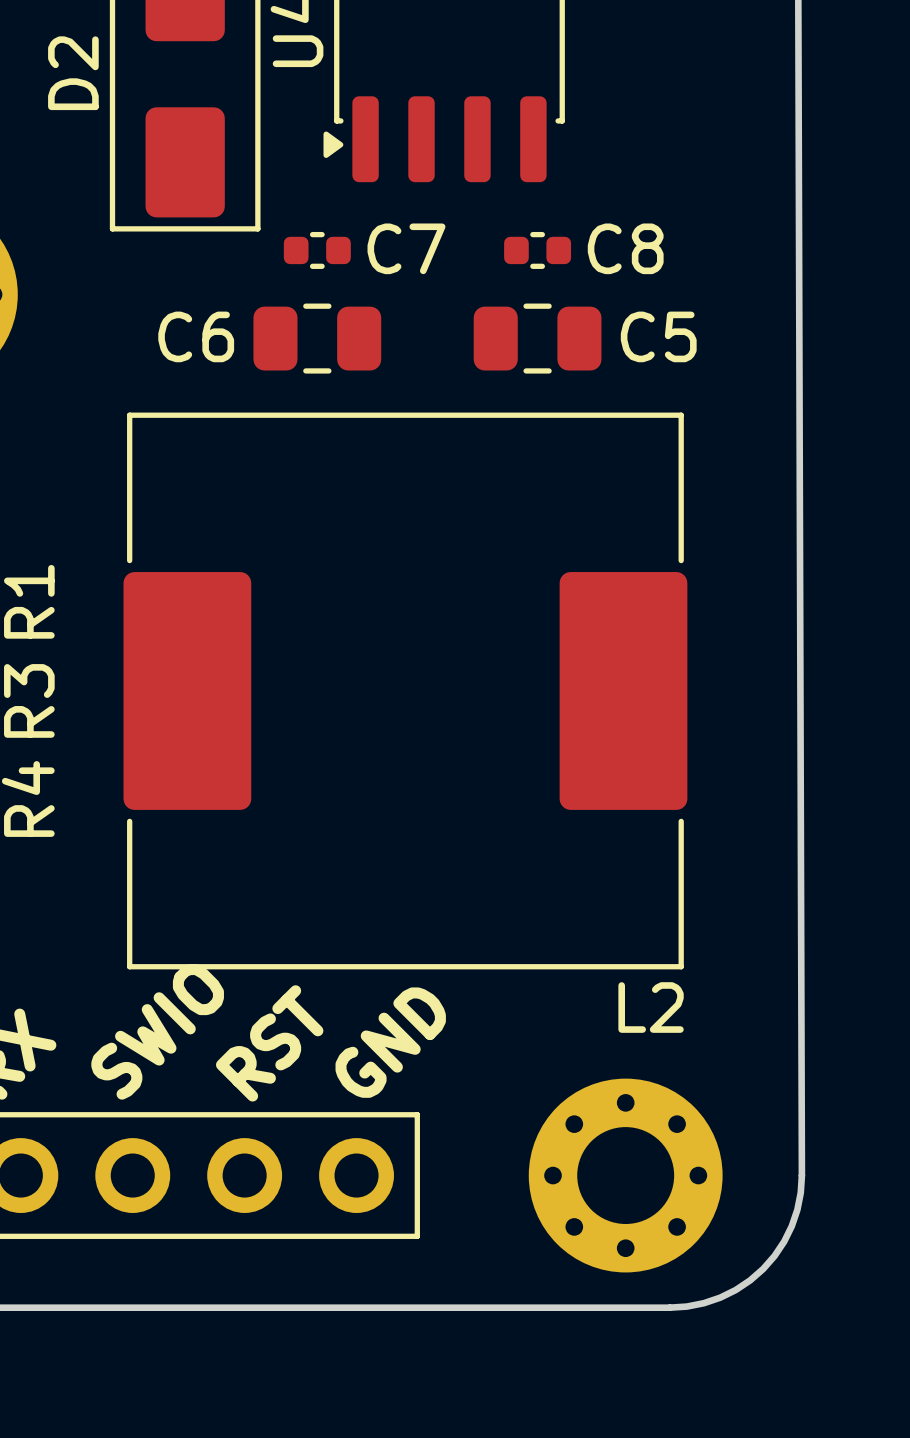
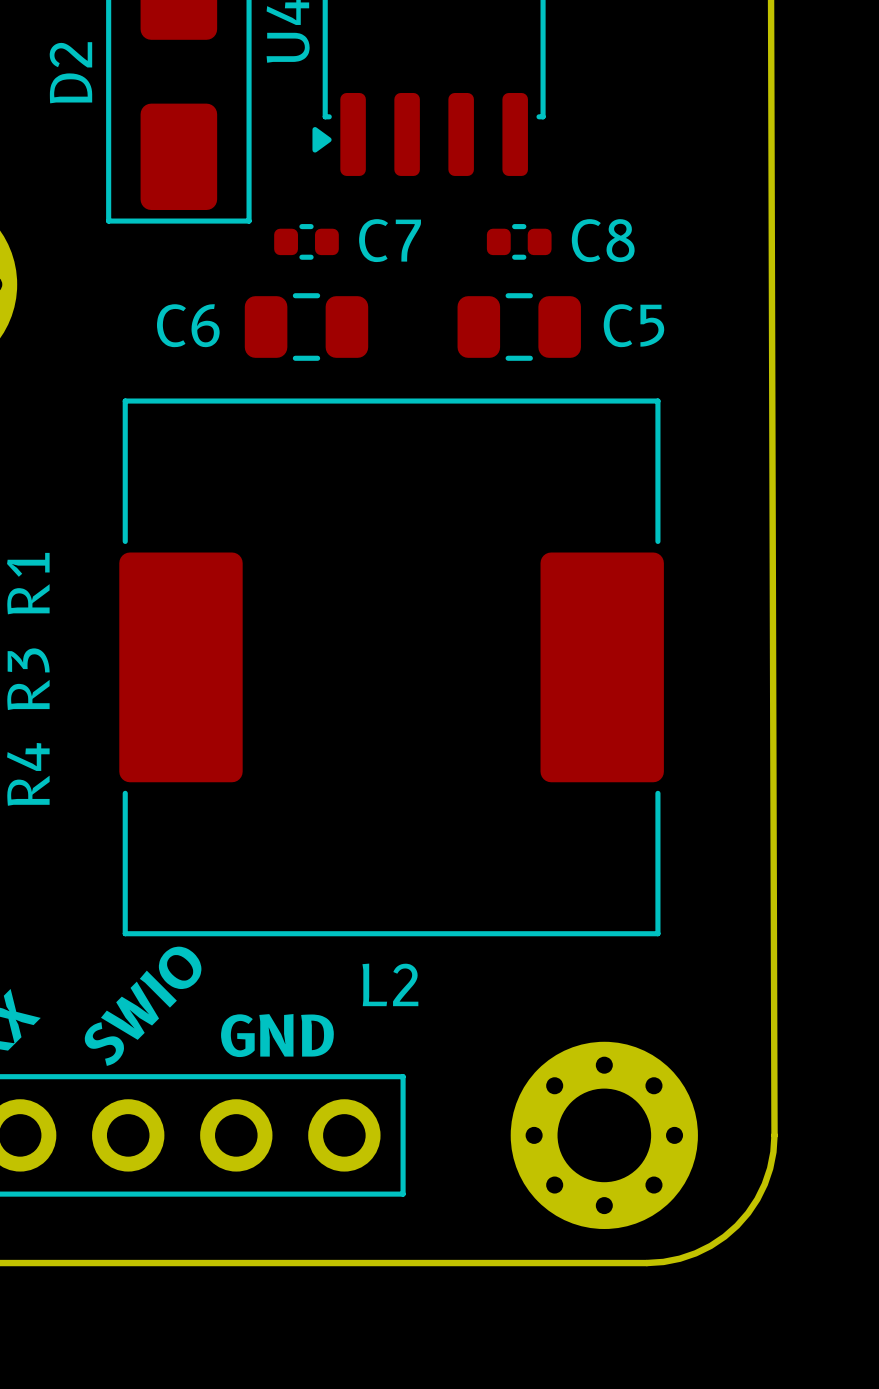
L2 name position: L2 (651, 1007) -> L2 (390, 984)
text: GND (390, 1042) -> none
text: RST (269, 1043) -> GND (277, 1035)

